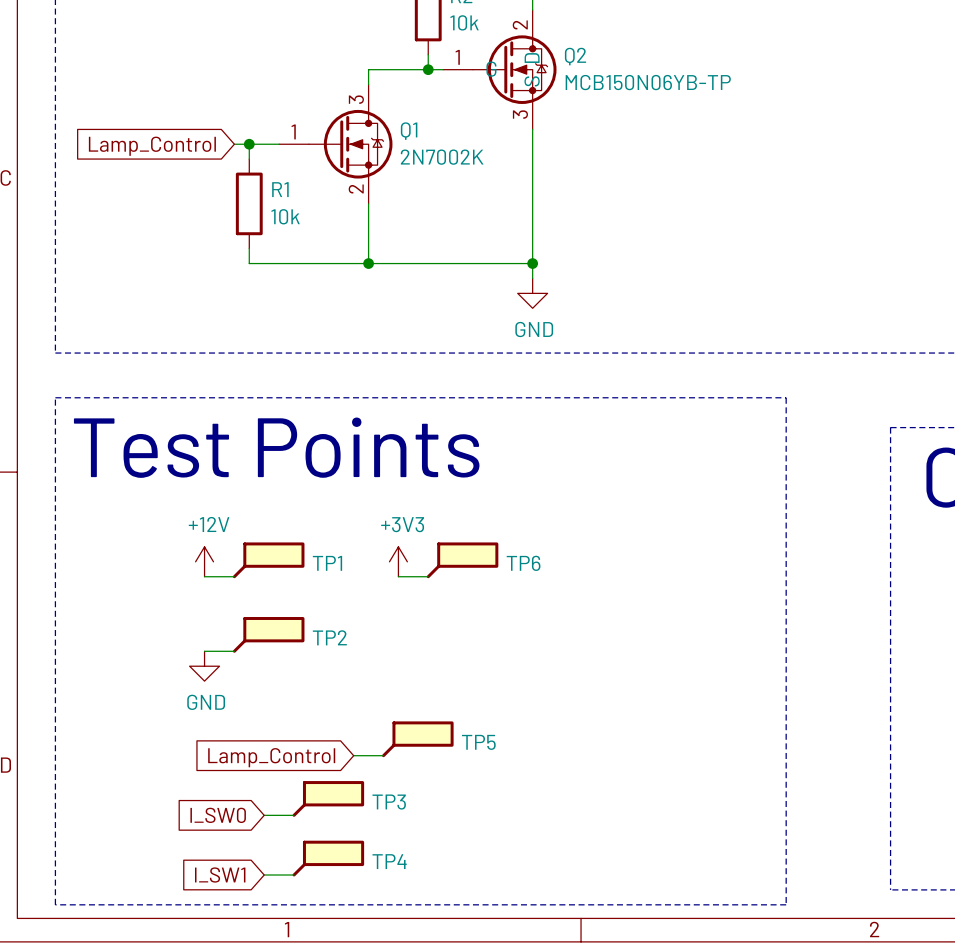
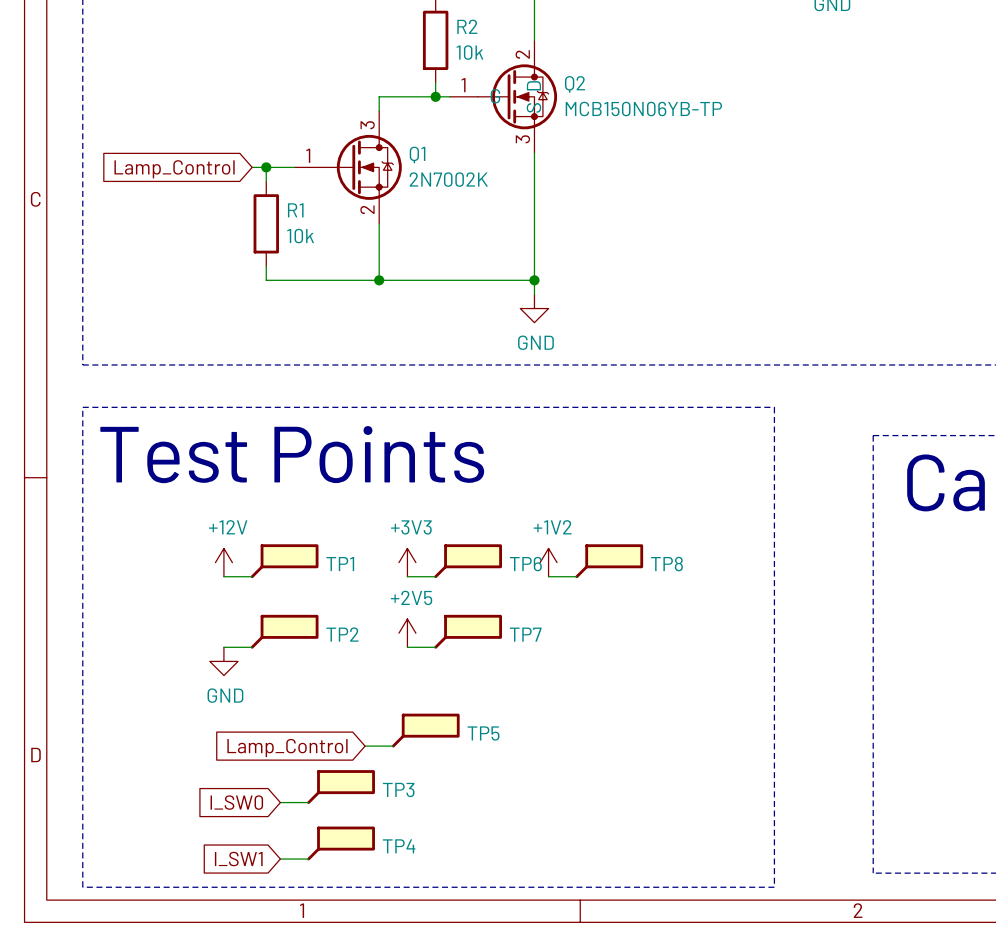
TP8: none -> (609, 561)
power symbol: none -> +1V2 (548, 562)
wire: none -> (548, 576) (576, 576)
TP7: none -> (468, 631)
power symbol: none -> +2V5 (407, 633)
wire: none -> (407, 647) (435, 647)

